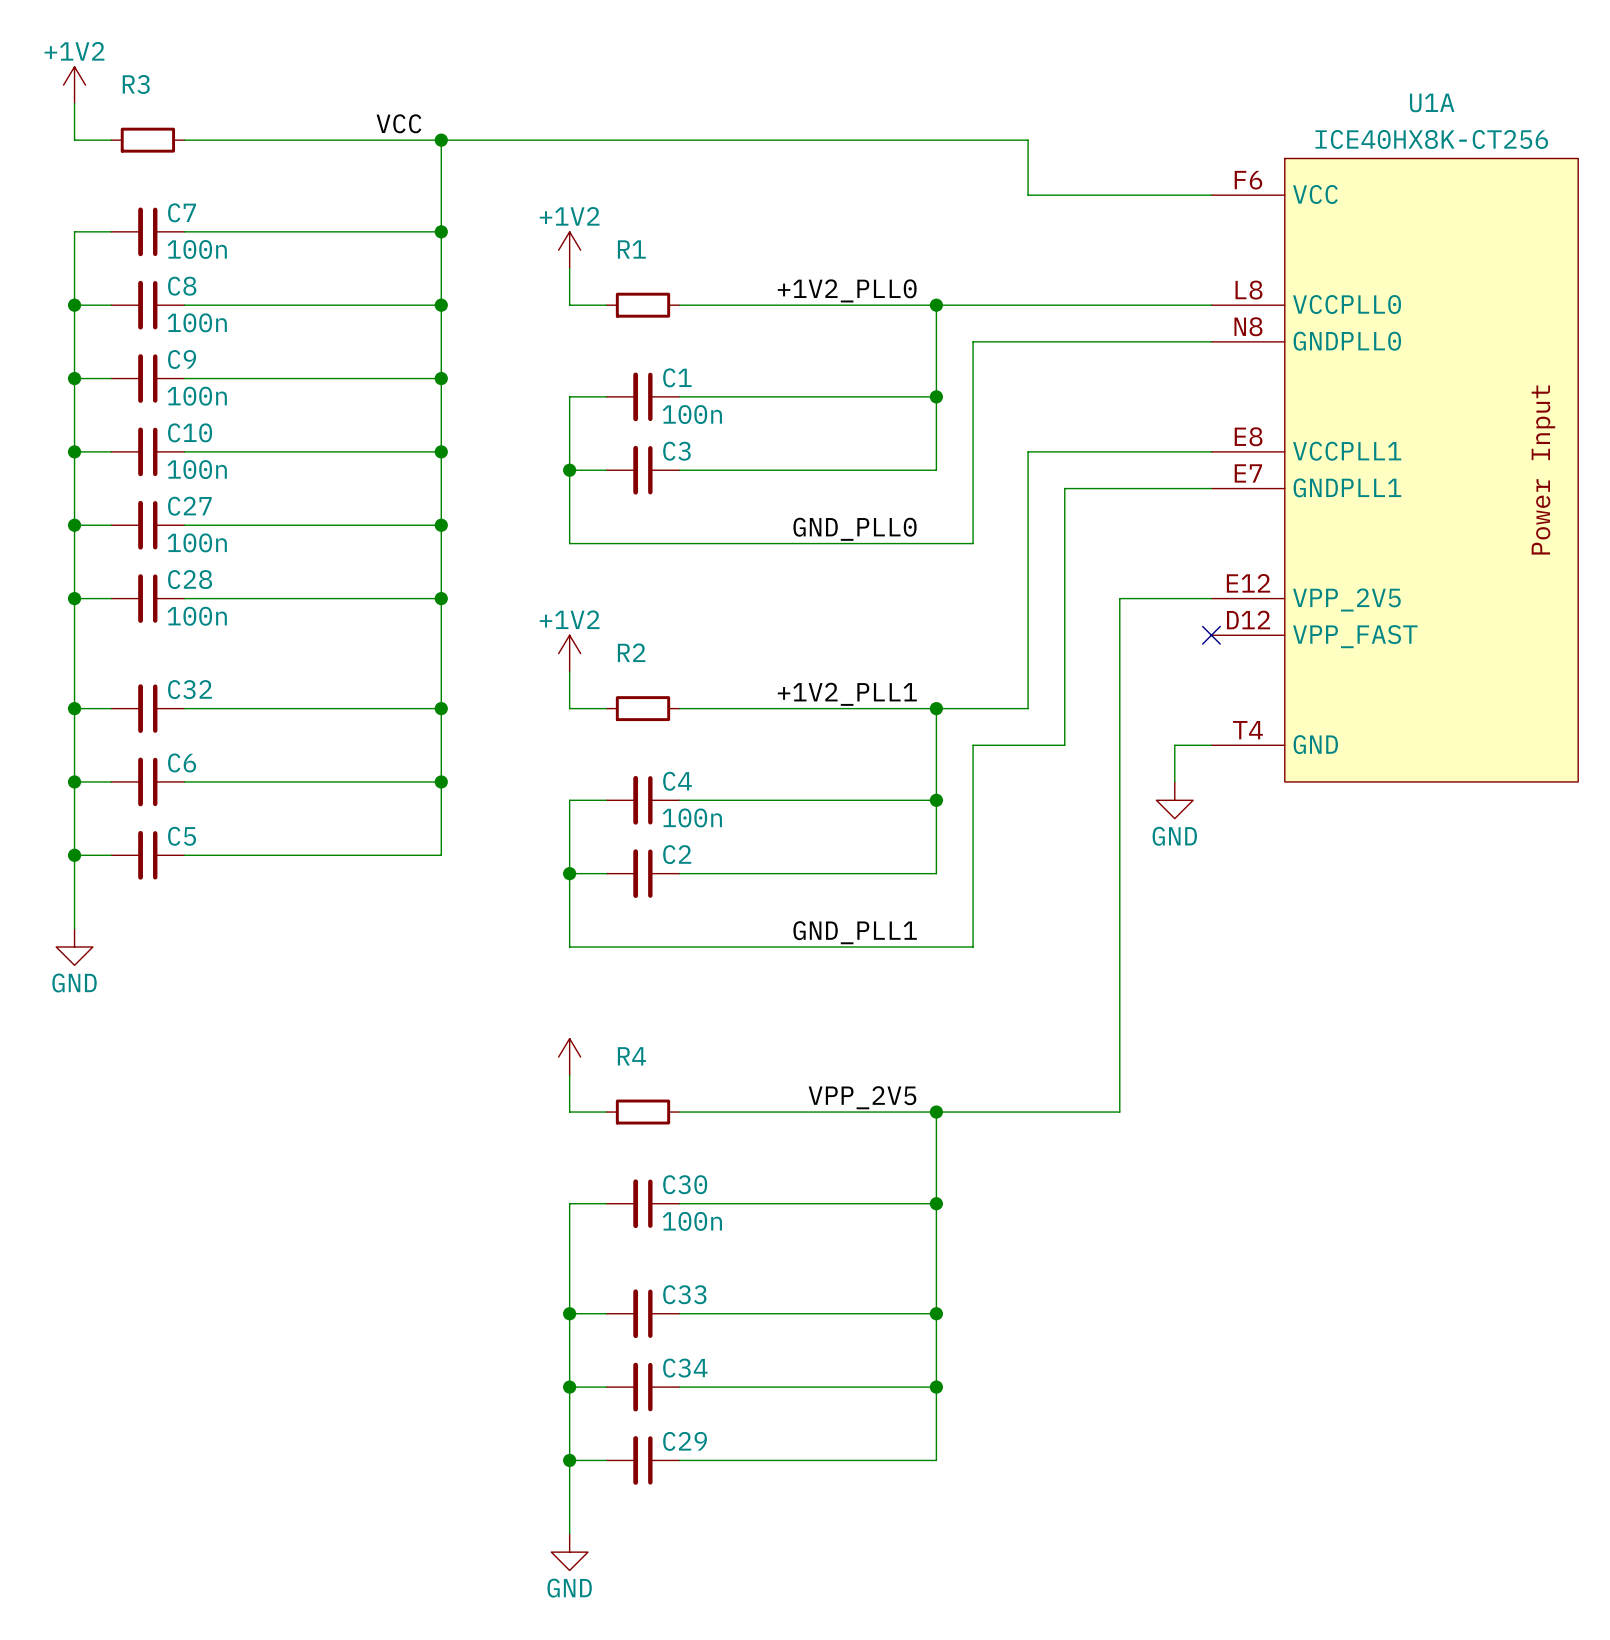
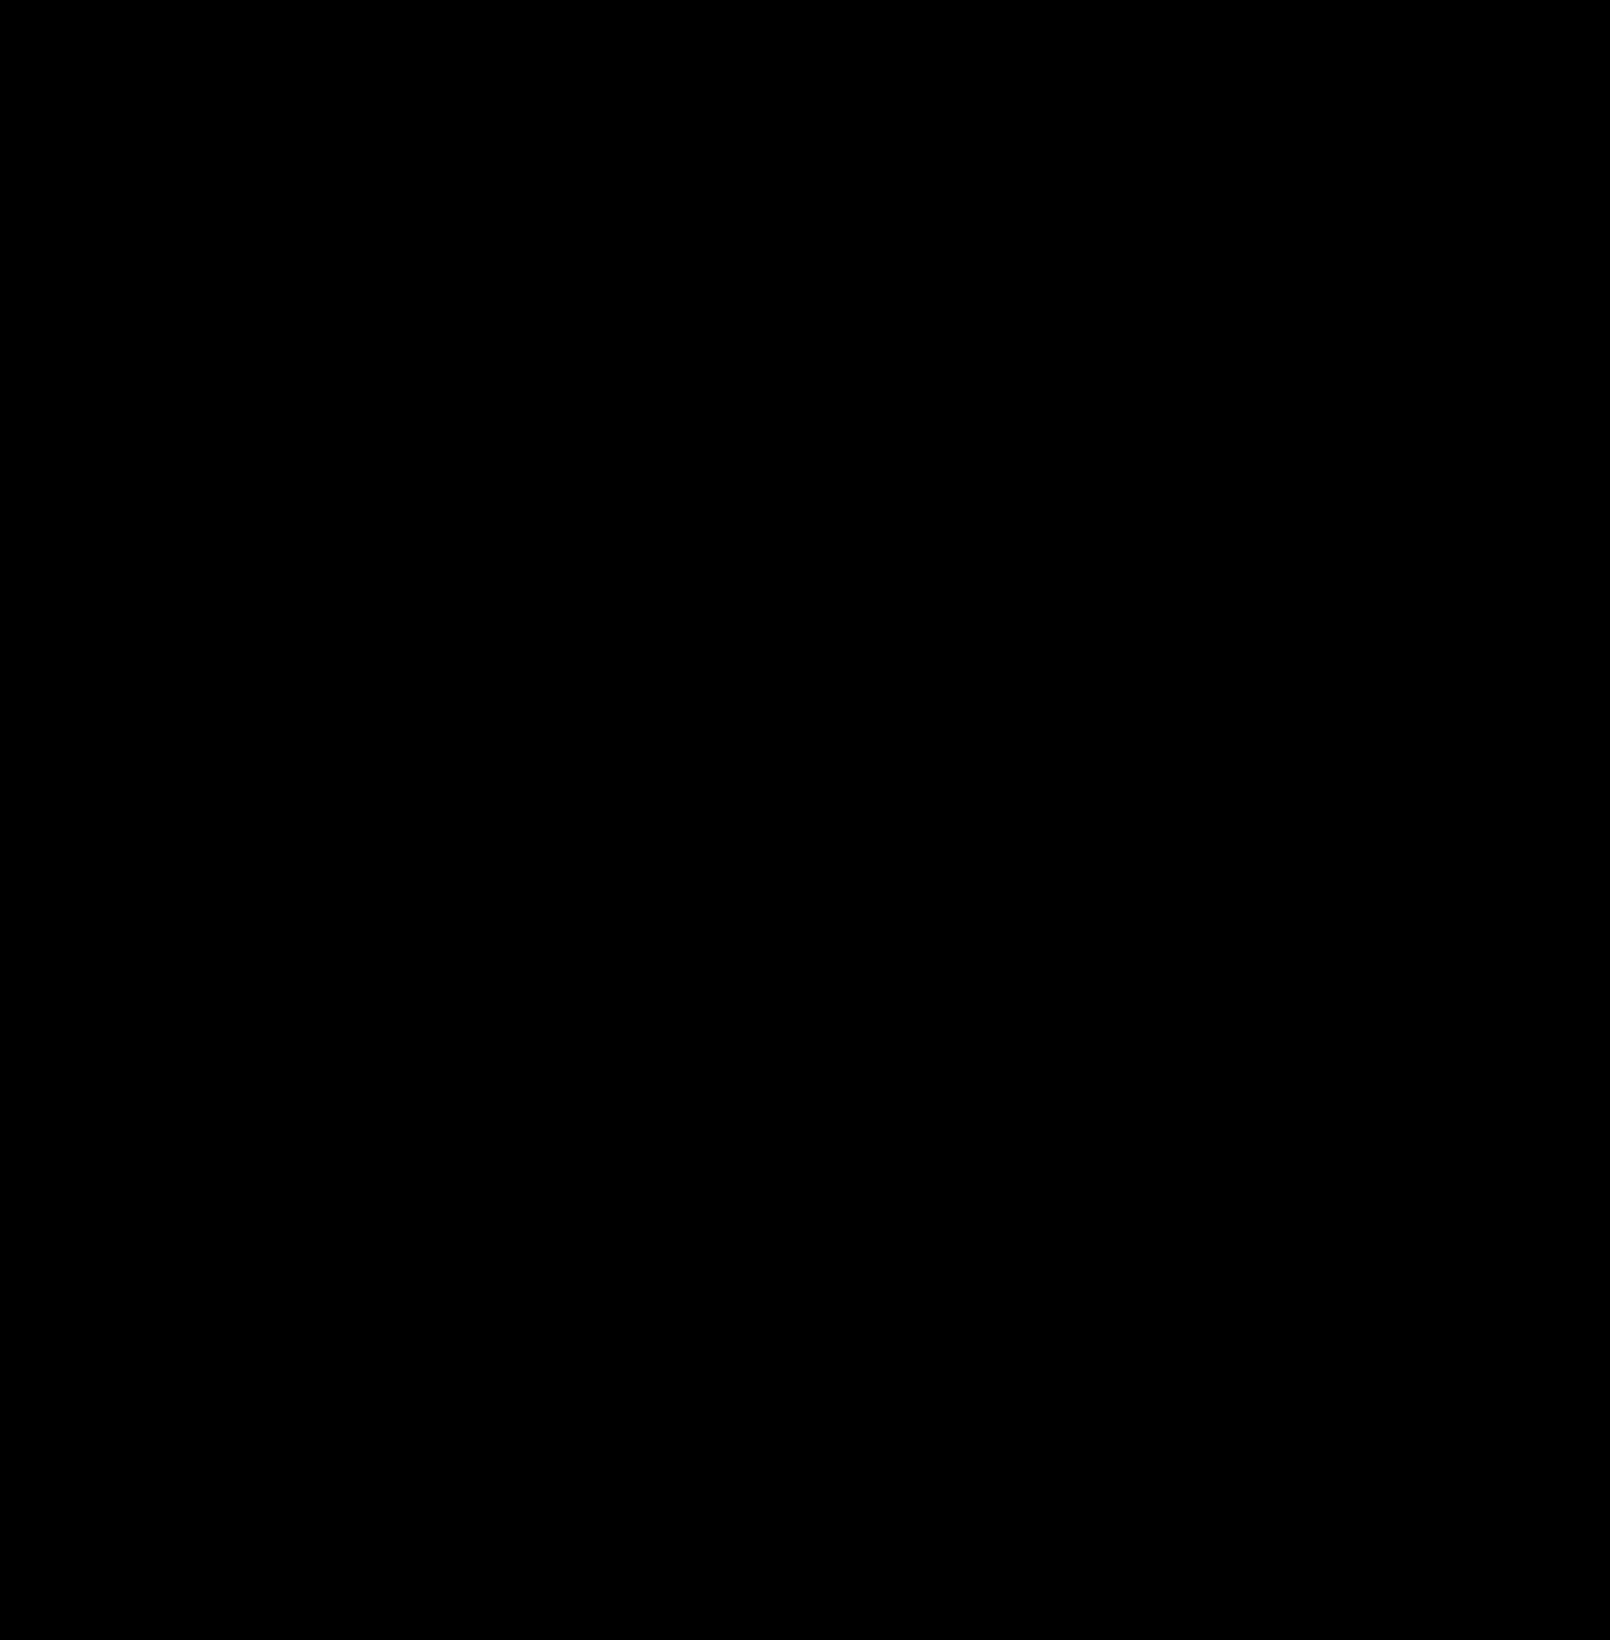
power symbol: +1V2 (74, 85) -> none
wire: (74, 103) (74, 140) (111, 140) -> none
label: VCC (398, 123) -> none
R3: (147, 140) -> none
wire: (184, 140) (1028, 140) (1028, 195) (1211, 195) -> none
wire: (441, 140) (441, 855) (184, 855) -> none
junction: (441, 140) -> none
wire: (111, 231) (74, 231) (74, 928) -> none
C7: 100n (147, 231) -> none
wire: (184, 231) (441, 231) -> none
junction: (441, 231) -> none
power symbol: +1V2 (569, 250) -> none
wire: (569, 268) (569, 305) (606, 305) -> none
label: +1V2_PLL0 (847, 290) -> none
wire: (74, 305) (111, 305) -> none
junction: (74, 305) -> none
C8: 100n (147, 305) -> none
wire: (184, 305) (441, 305) -> none
junction: (441, 305) -> none
R1: (642, 305) -> none
wire: (679, 305) (1211, 305) -> none
wire: (936, 305) (936, 470) (679, 470) -> none
junction: (936, 305) -> none
wire: (1211, 341) (973, 341) (973, 543) (569, 543) (569, 396) (606, 396) -> none
wire: (74, 378) (111, 378) -> none
junction: (74, 378) -> none
C9: 100n (147, 378) -> none
wire: (184, 378) (441, 378) -> none
junction: (441, 378) -> none
C1: 100n (642, 396) -> none
wire: (679, 396) (936, 396) -> none
junction: (936, 396) -> none
wire: (74, 451) (111, 451) -> none
junction: (74, 451) -> none
C10: 100n (147, 451) -> none
wire: (184, 451) (441, 451) -> none
junction: (441, 451) -> none
wire: (1211, 451) (1028, 451) (1028, 708) (679, 708) -> none
wire: (569, 470) (606, 470) -> none
junction: (569, 470) -> none
C3: (642, 470) -> none
U1A: ICE40HX8K-CT256 (1394, 470) -> none
wire: (1211, 488) (1064, 488) (1064, 745) (973, 745) (973, 947) (569, 947) (569, 800) (606, 800) -> none
wire: (74, 525) (111, 525) -> none
junction: (74, 525) -> none
C27: 100n (147, 525) -> none
wire: (184, 525) (441, 525) -> none
junction: (441, 525) -> none
label: GND_PLL0 (855, 529) -> none
wire: (74, 598) (111, 598) -> none
junction: (74, 598) -> none
C28: 100n (147, 598) -> none
wire: (184, 598) (441, 598) -> none
junction: (441, 598) -> none
wire: (1211, 598) (1119, 598) (1119, 1112) (679, 1112) -> none
no-connect mark: (1211, 635) -> none
power symbol: +1V2 (569, 653) -> none
wire: (569, 671) (569, 708) (606, 708) -> none
label: +1V2_PLL1 (847, 694) -> none
wire: (74, 708) (111, 708) -> none
junction: (74, 708) -> none
C32: (147, 708) -> none
wire: (184, 708) (441, 708) -> none
junction: (441, 708) -> none
R2: (642, 708) -> none
wire: (936, 708) (936, 873) (679, 873) -> none
junction: (936, 708) -> none
wire: (1211, 745) (1174, 745) (1174, 781) -> none
wire: (74, 781) (111, 781) -> none
junction: (74, 781) -> none
C6: (147, 781) -> none
wire: (184, 781) (441, 781) -> none
junction: (441, 781) -> none
C4: 100n (642, 800) -> none
wire: (679, 800) (936, 800) -> none
junction: (936, 800) -> none
power symbol: GND (1174, 800) -> none
wire: (74, 855) (111, 855) -> none
junction: (74, 855) -> none
C5: (147, 855) -> none
wire: (569, 873) (606, 873) -> none
junction: (569, 873) -> none
C2: (642, 873) -> none
label: GND_PLL1 (855, 932) -> none
power symbol: GND (74, 947) -> none
power symbol: (569, 1057) -> none
wire: (569, 1075) (569, 1112) (606, 1112) -> none
label: VPP_2V5 (862, 1097) -> none
R4: (642, 1112) -> none
wire: (936, 1112) (936, 1460) (679, 1460) -> none
junction: (936, 1112) -> none
wire: (606, 1203) (569, 1203) (569, 1533) -> none
C30: 100n (642, 1203) -> none
wire: (679, 1203) (936, 1203) -> none
junction: (936, 1203) -> none
wire: (569, 1313) (606, 1313) -> none
junction: (569, 1313) -> none
C33: (642, 1313) -> none
wire: (679, 1313) (936, 1313) -> none
junction: (936, 1313) -> none
wire: (569, 1387) (606, 1387) -> none
junction: (569, 1387) -> none
C34: (642, 1387) -> none
wire: (679, 1387) (936, 1387) -> none
junction: (936, 1387) -> none
wire: (569, 1460) (606, 1460) -> none
junction: (569, 1460) -> none
C29: (642, 1460) -> none
power symbol: GND (569, 1552) -> none

